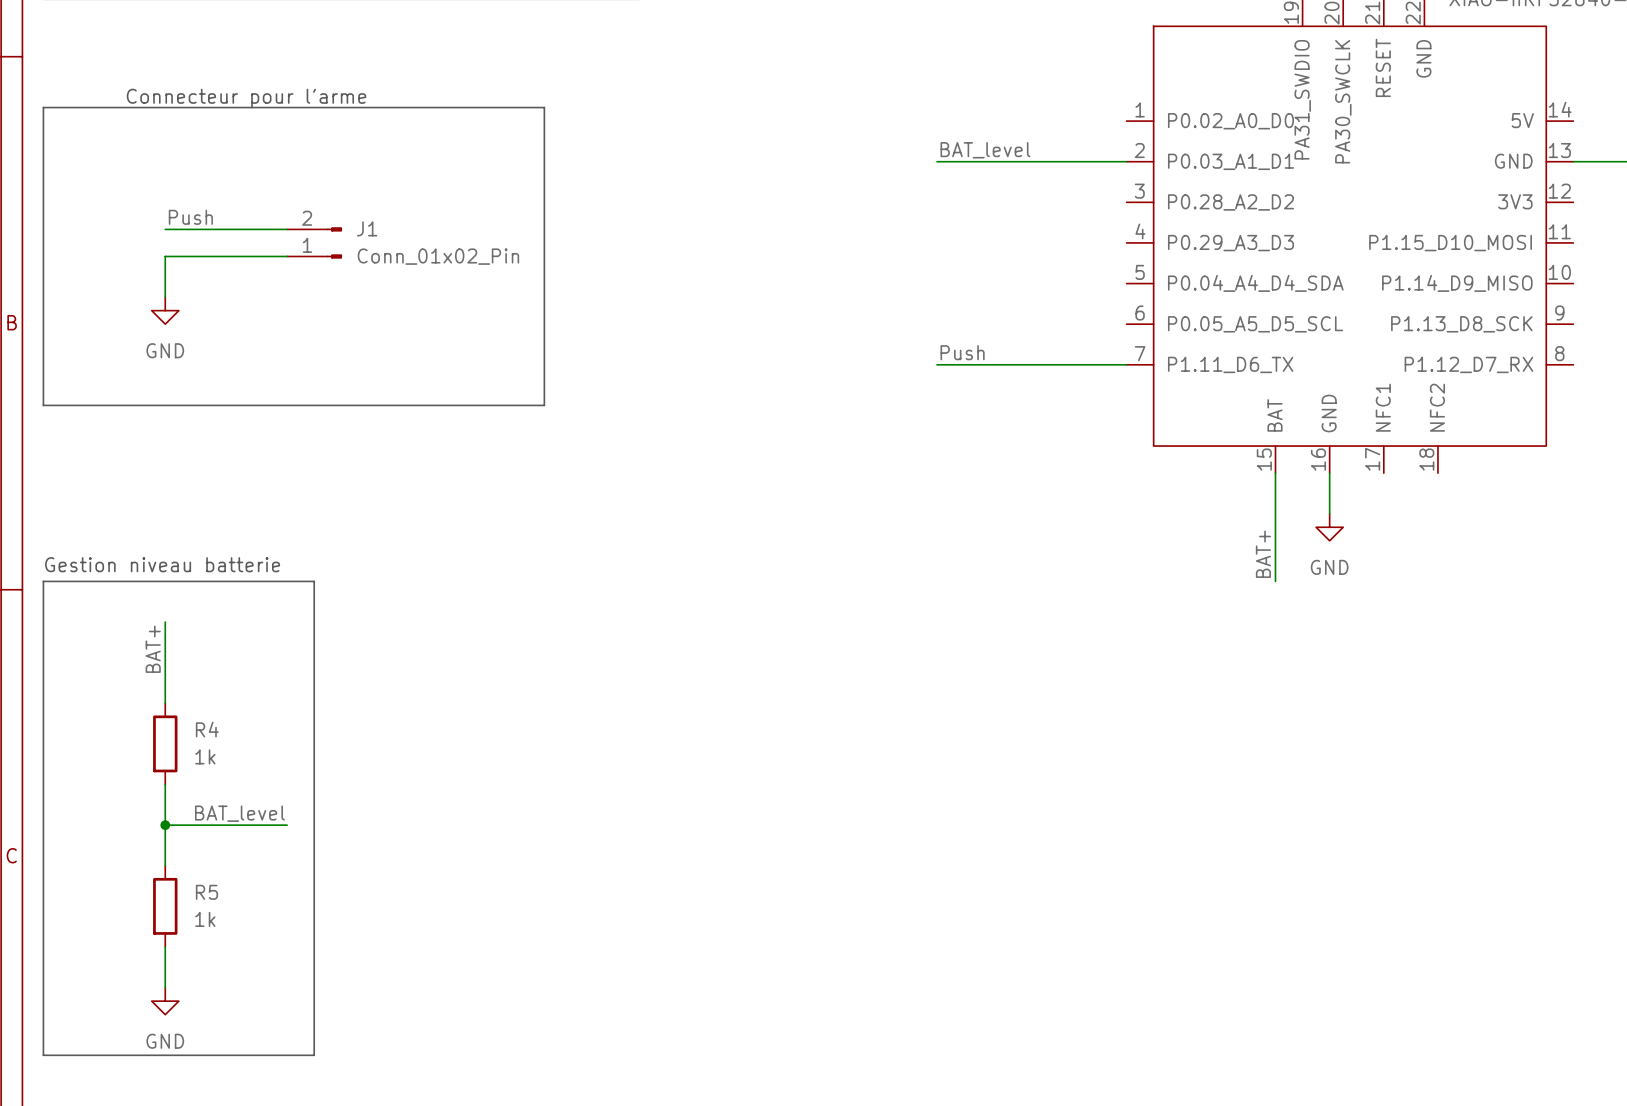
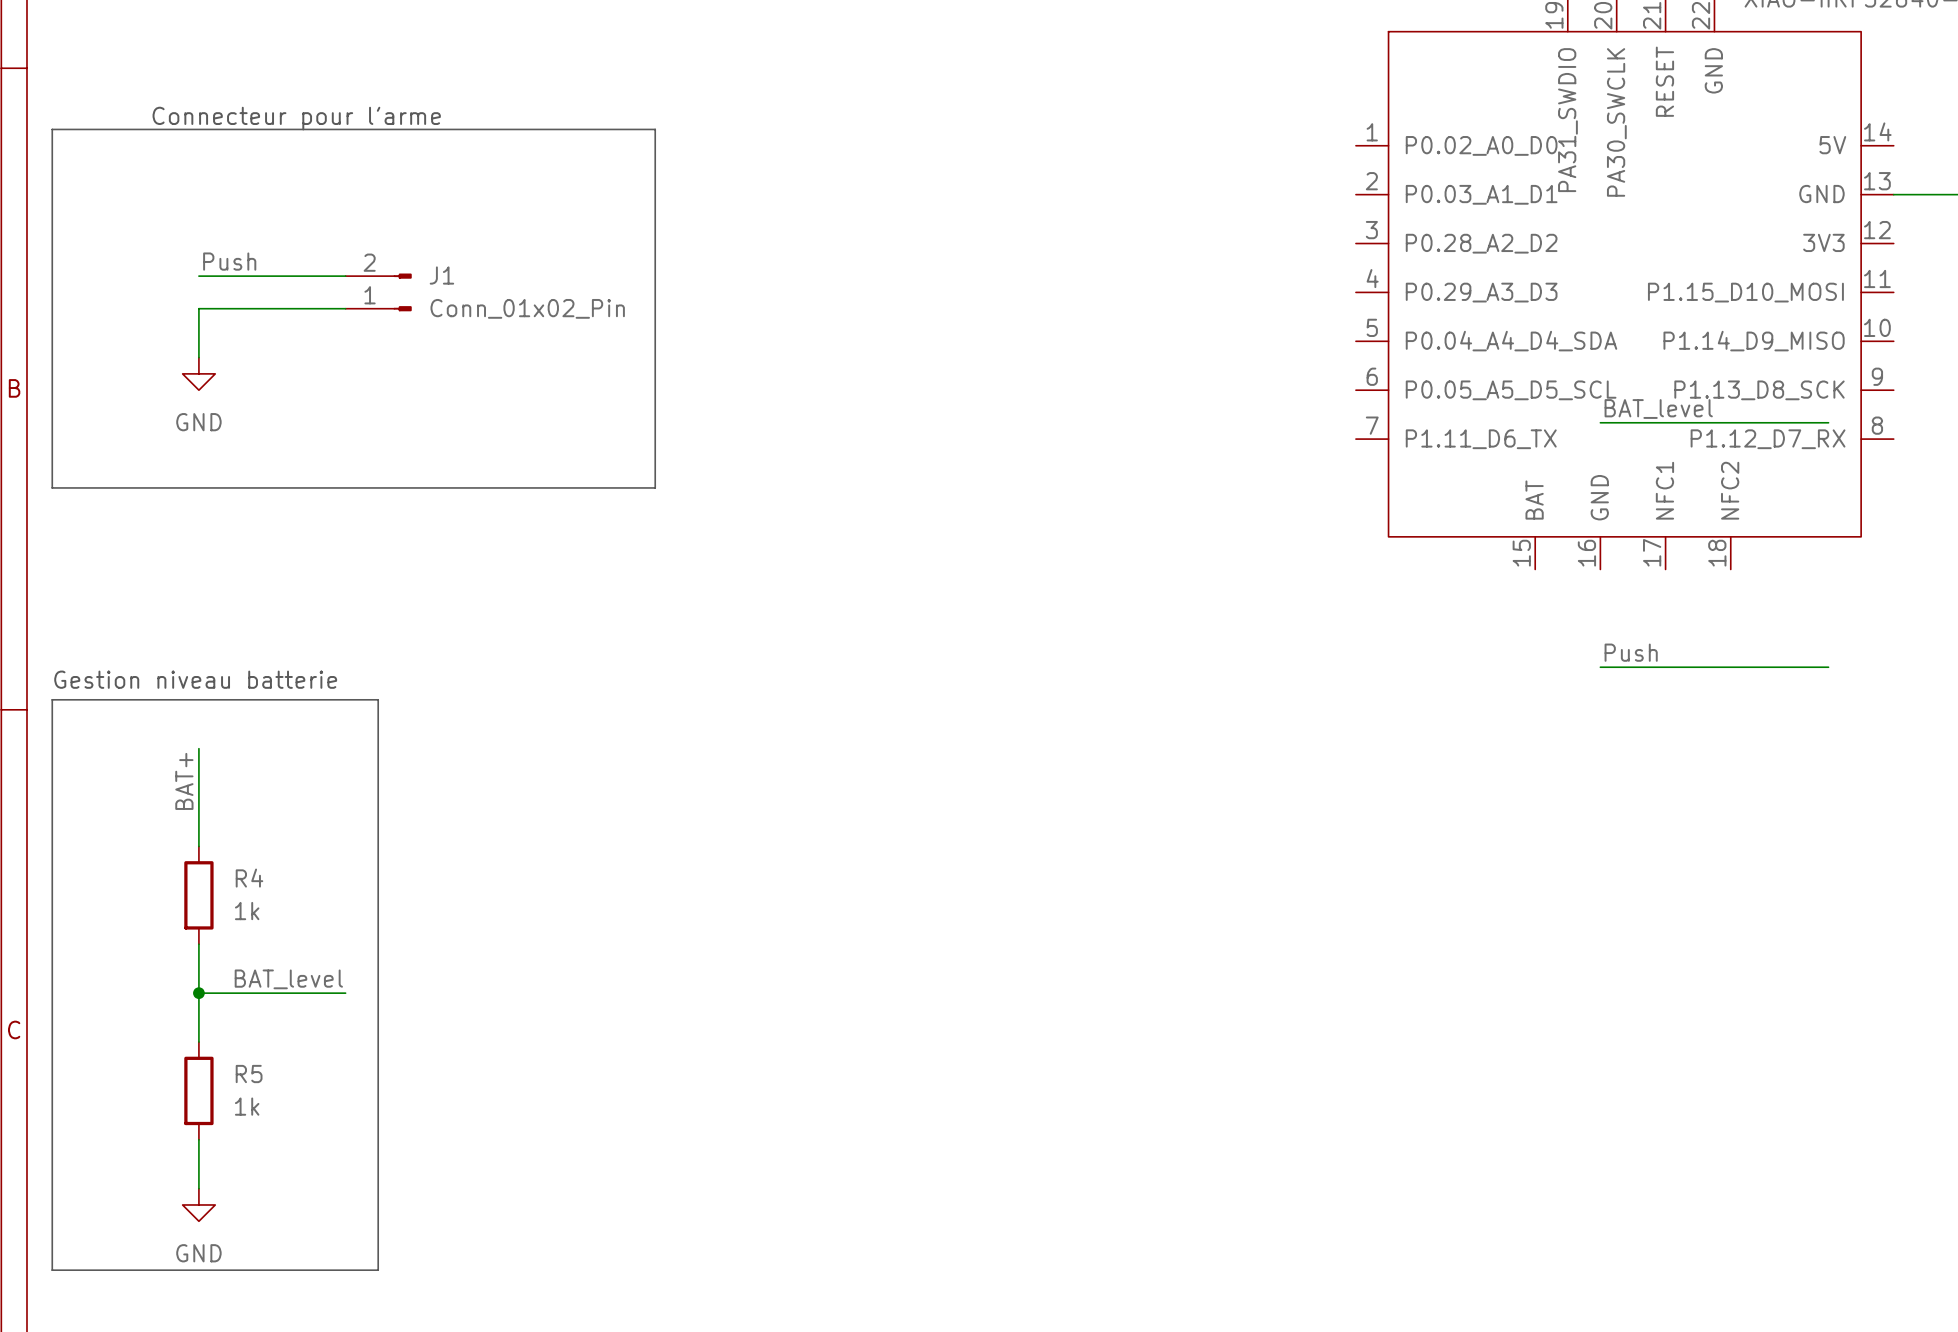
label: BAT_level (985, 150) -> none
wire: (937, 161) (1126, 161) -> none
label: none -> BAT_level (1658, 409)
wire: none -> (1600, 422) (1828, 422)
label: Push (962, 352) -> none
wire: (937, 364) (1126, 364) -> none
wire: (1275, 473) (1275, 581) -> none
wire: (1329, 473) (1329, 513) -> none
power symbol: GND (1329, 527) -> none
label: none -> Push (1631, 652)
label: BAT+ (1263, 554) -> none
wire: none -> (1600, 667) (1828, 667)

